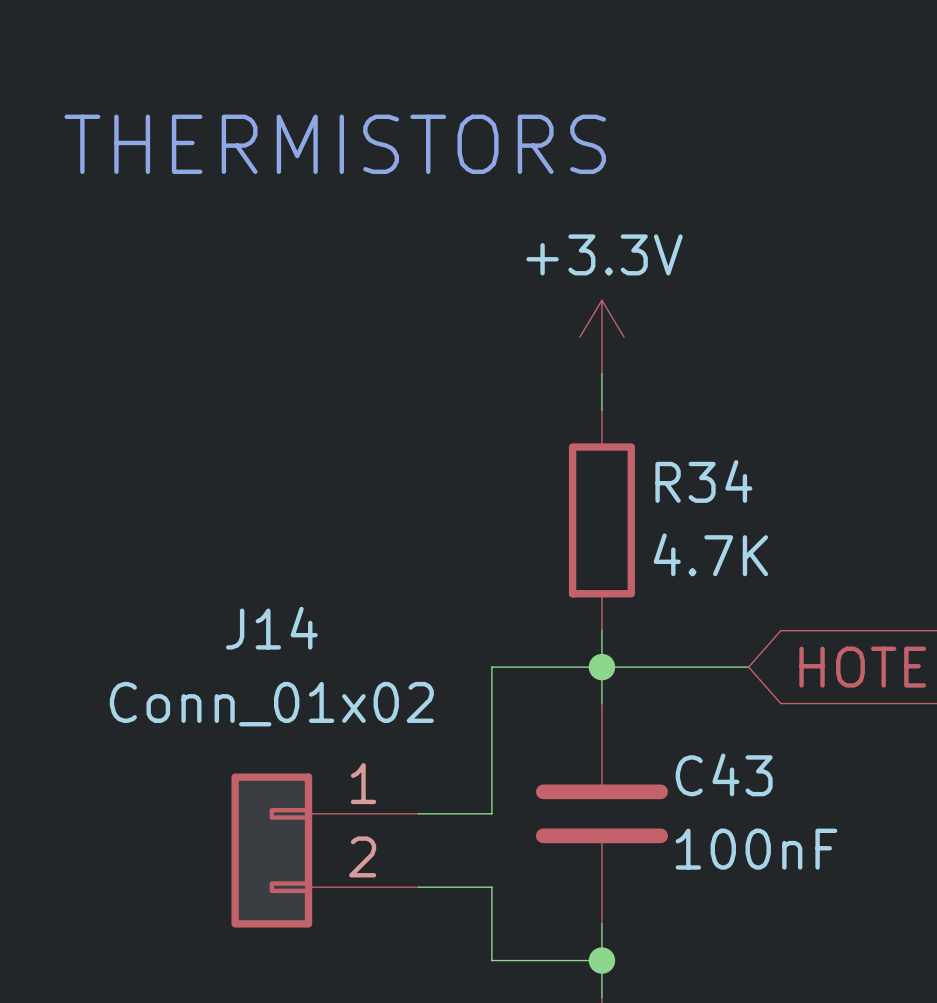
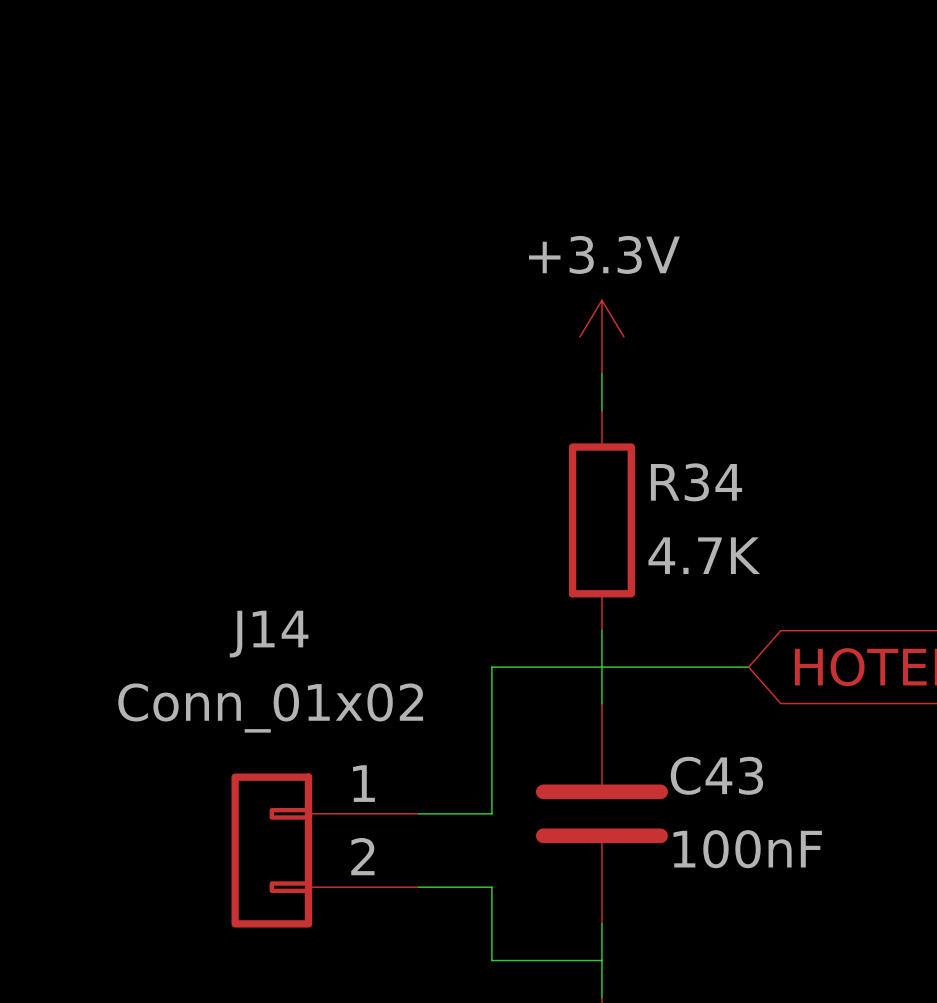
text: THERMISTORS (335, 144) -> none
junction: (601, 667) -> none
junction: (601, 960) -> none

